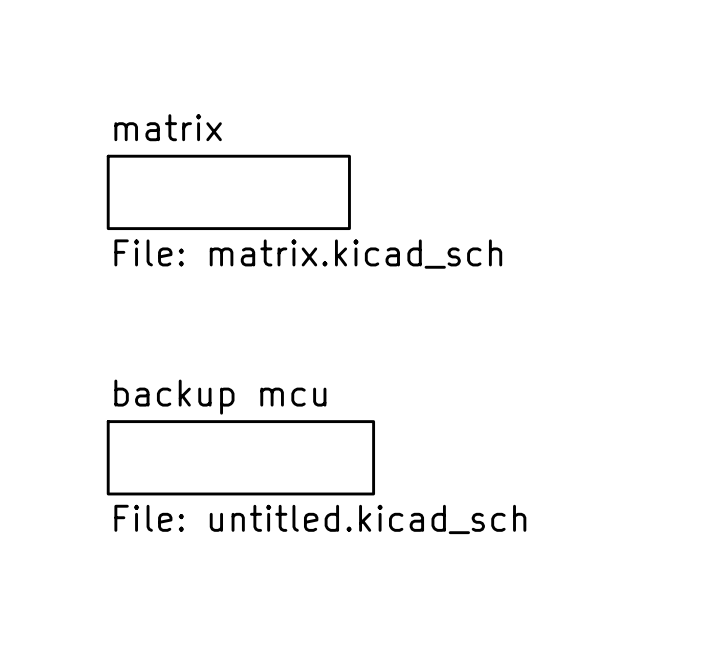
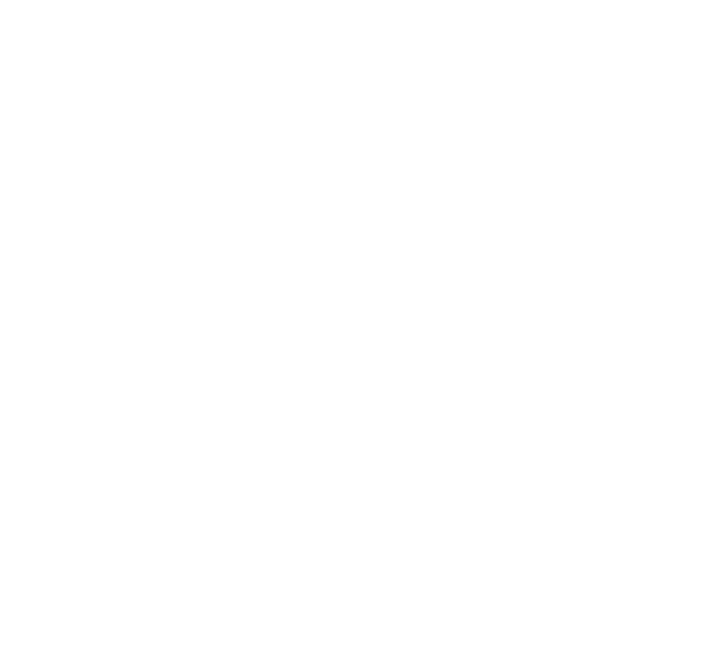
sheet matrix: File: matrix.kicad_sch (228, 192) -> none
sheet backup mcu: File: untitled.kicad_sch (240, 457) -> none

